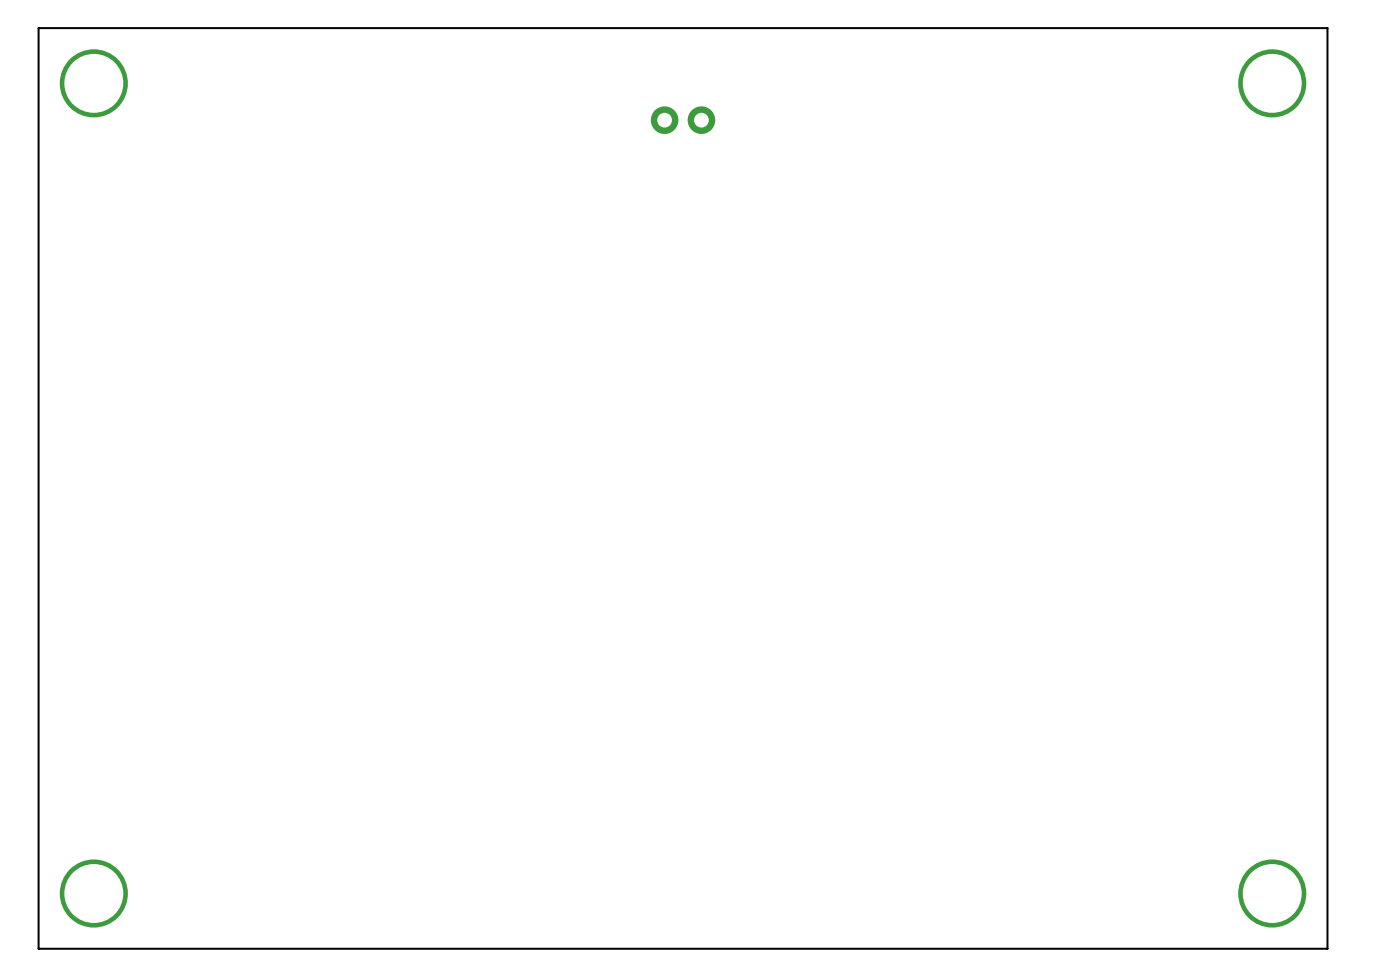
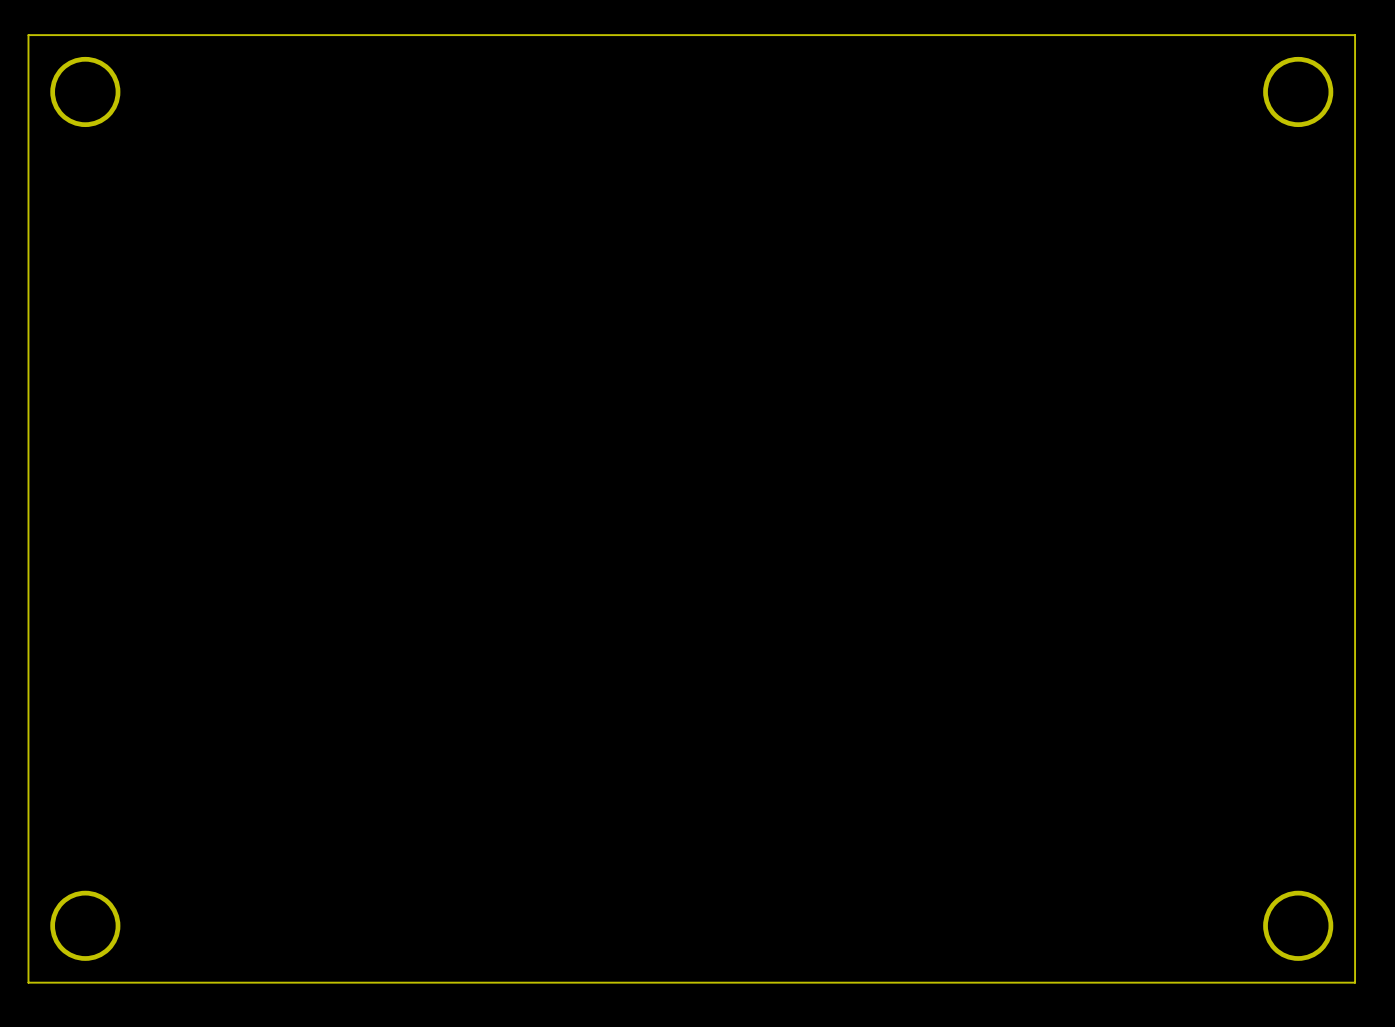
part: (683, 120) -> none

